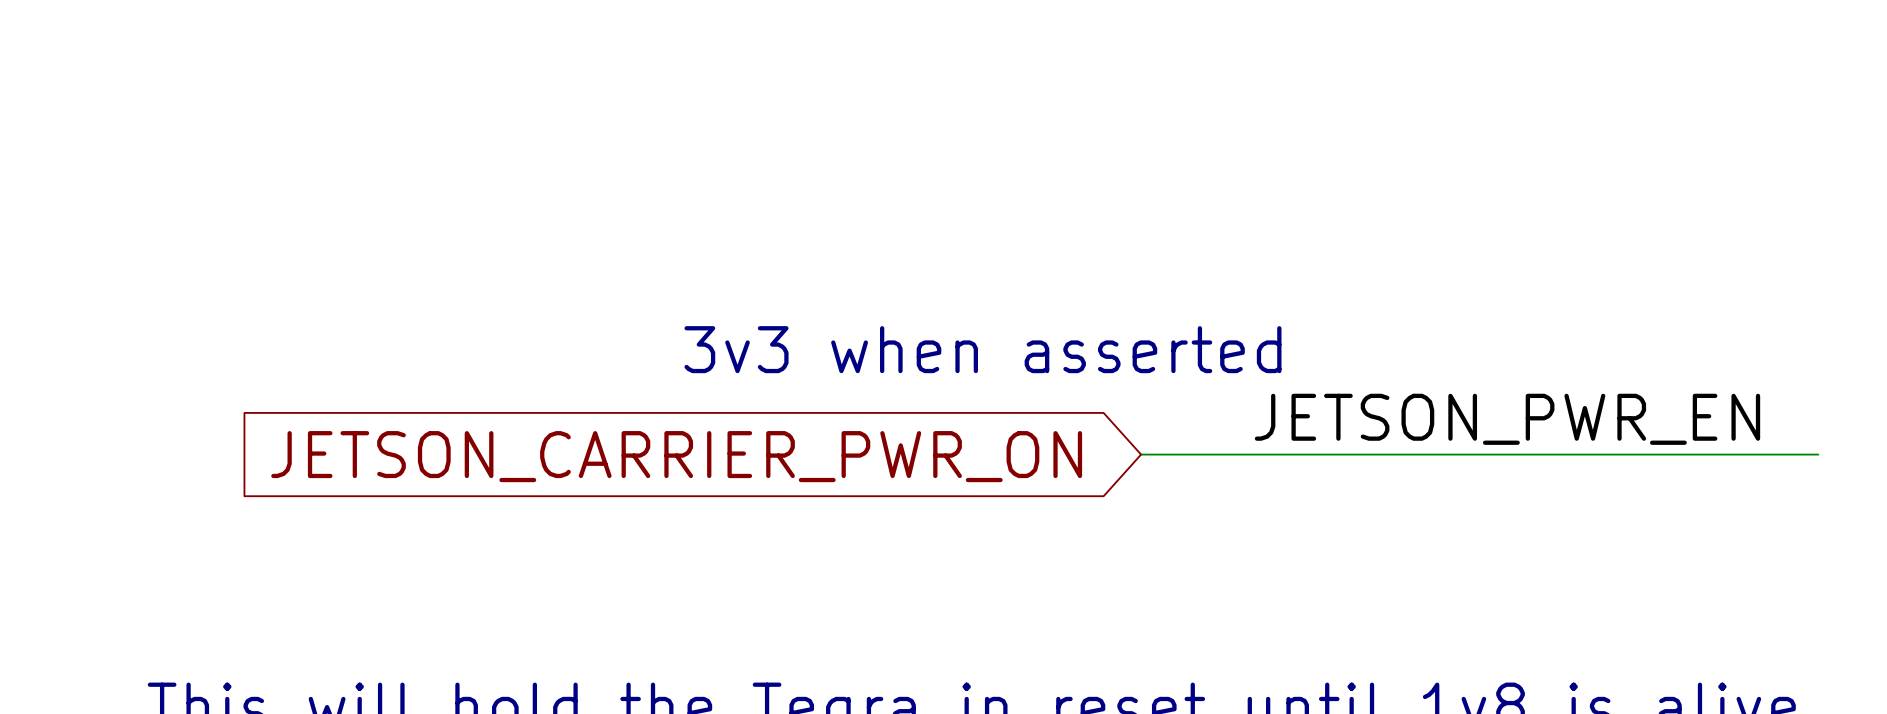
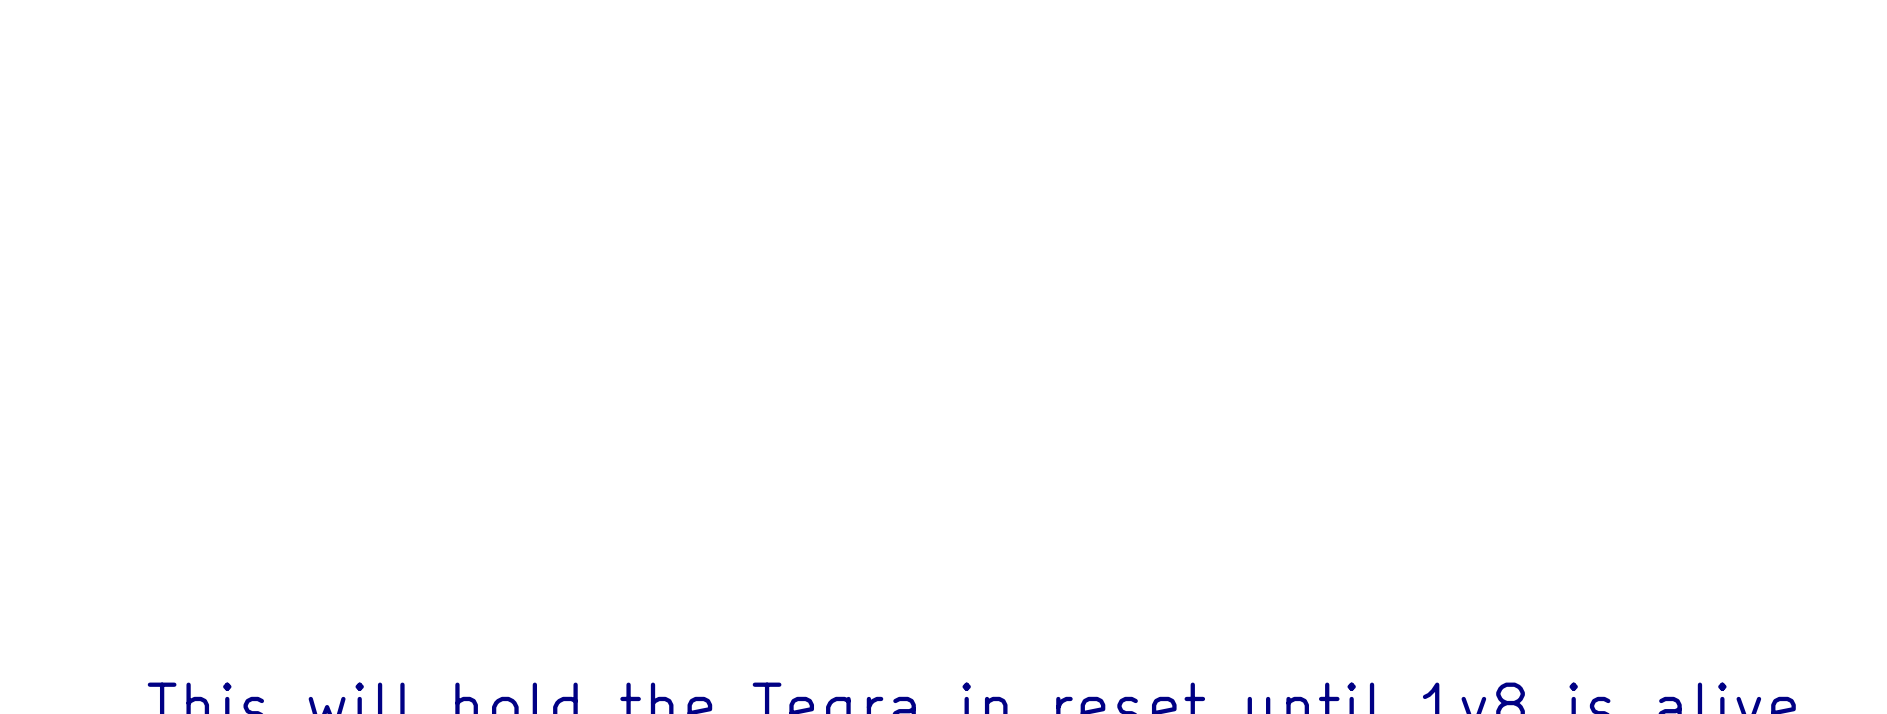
text: 3v3 when asserted (982, 349) -> none
label: JETSON_PWR_EN (1507, 419) -> none
wire: (1141, 454) (1818, 454) -> none
global label: JETSON_CARRIER_PWR_ON (676, 456) -> none

